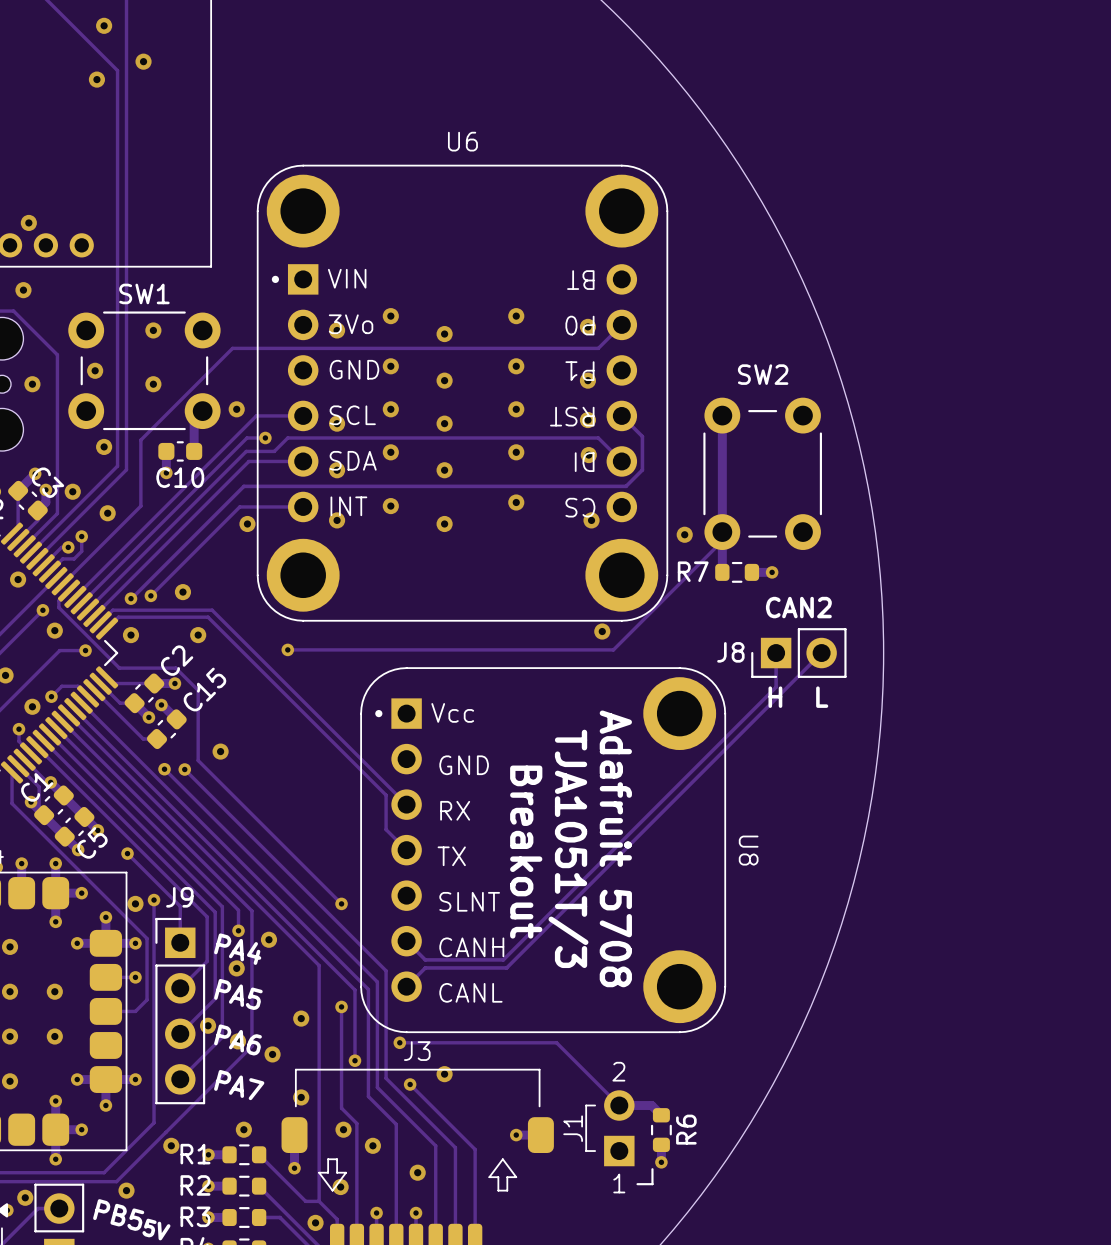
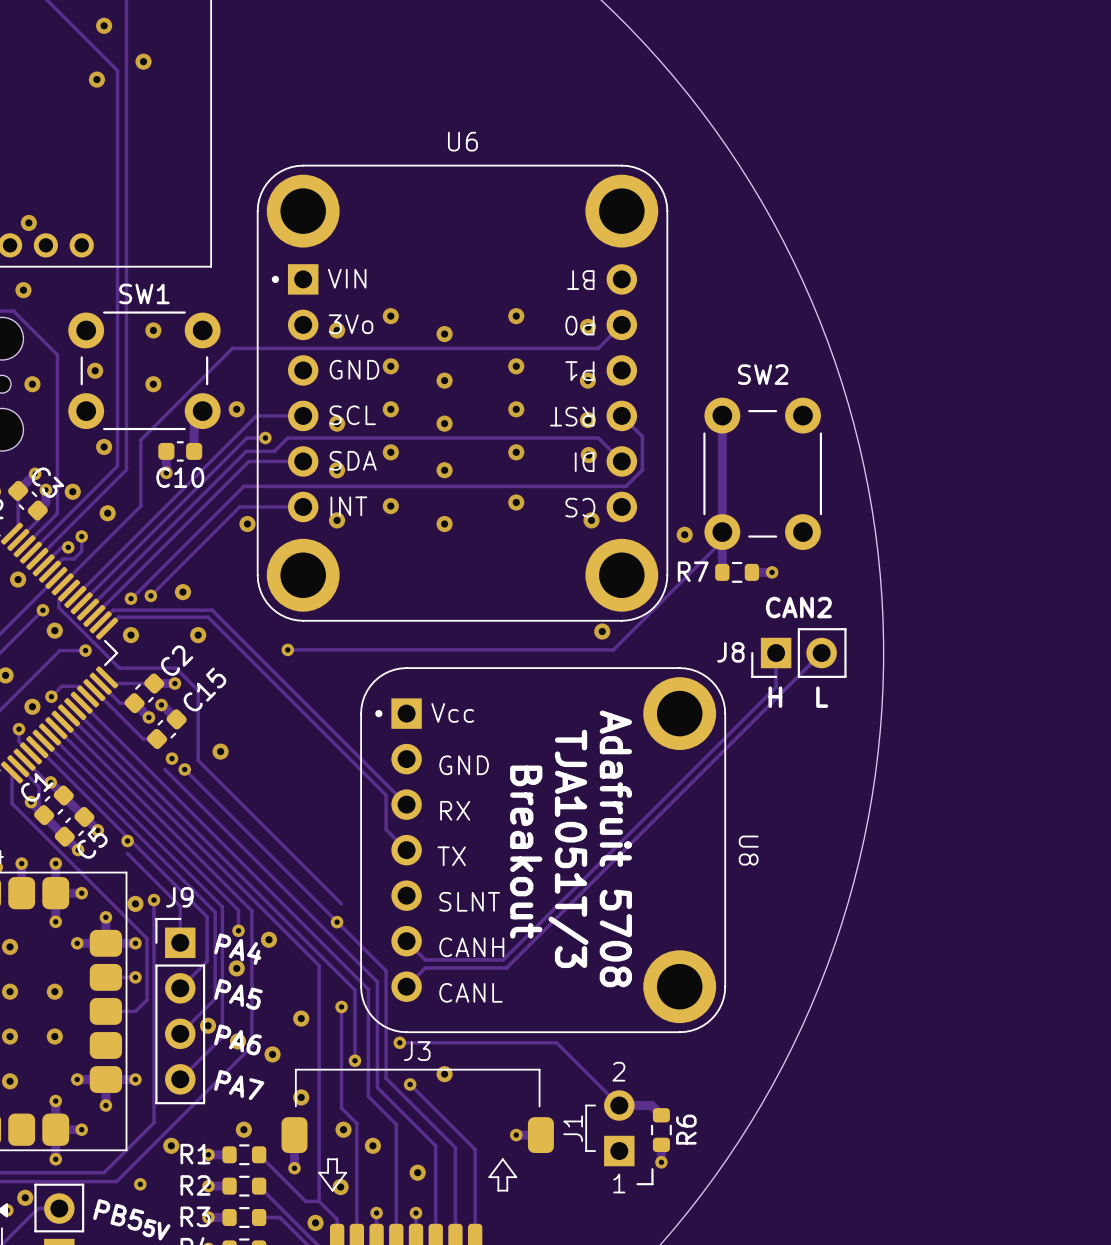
via position: (164, 769) -> (171, 758)
via position: (127, 853) -> (127, 841)
via position: (341, 903) -> (337, 922)
via position: (126, 1190) -> (140, 1184)

